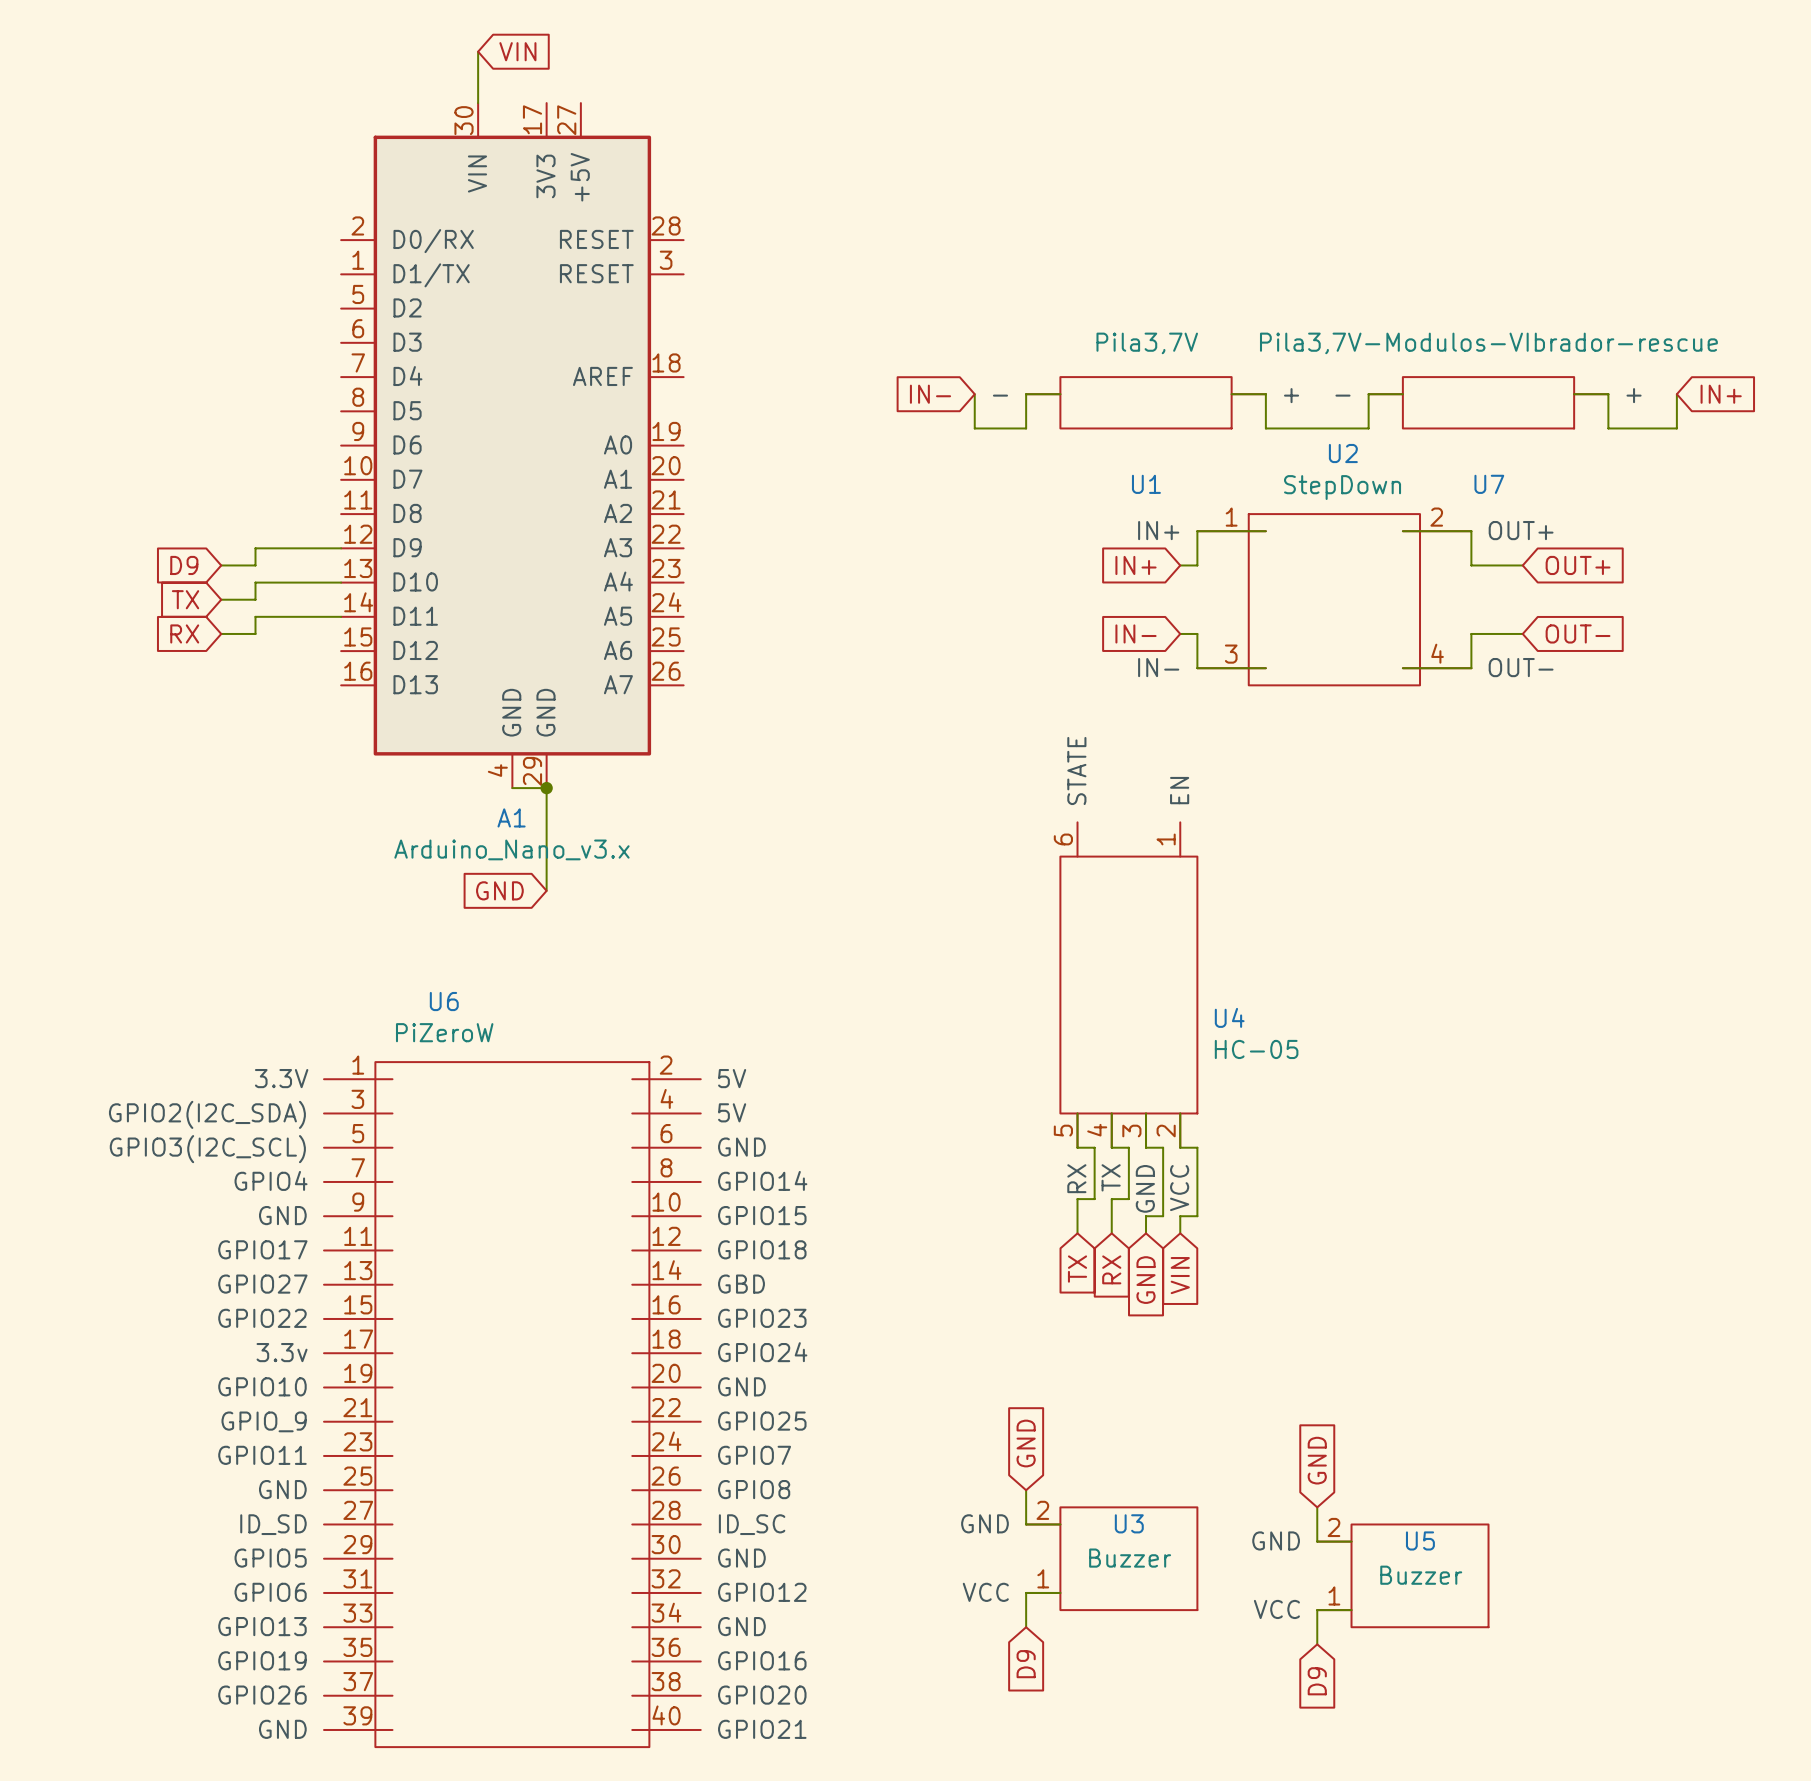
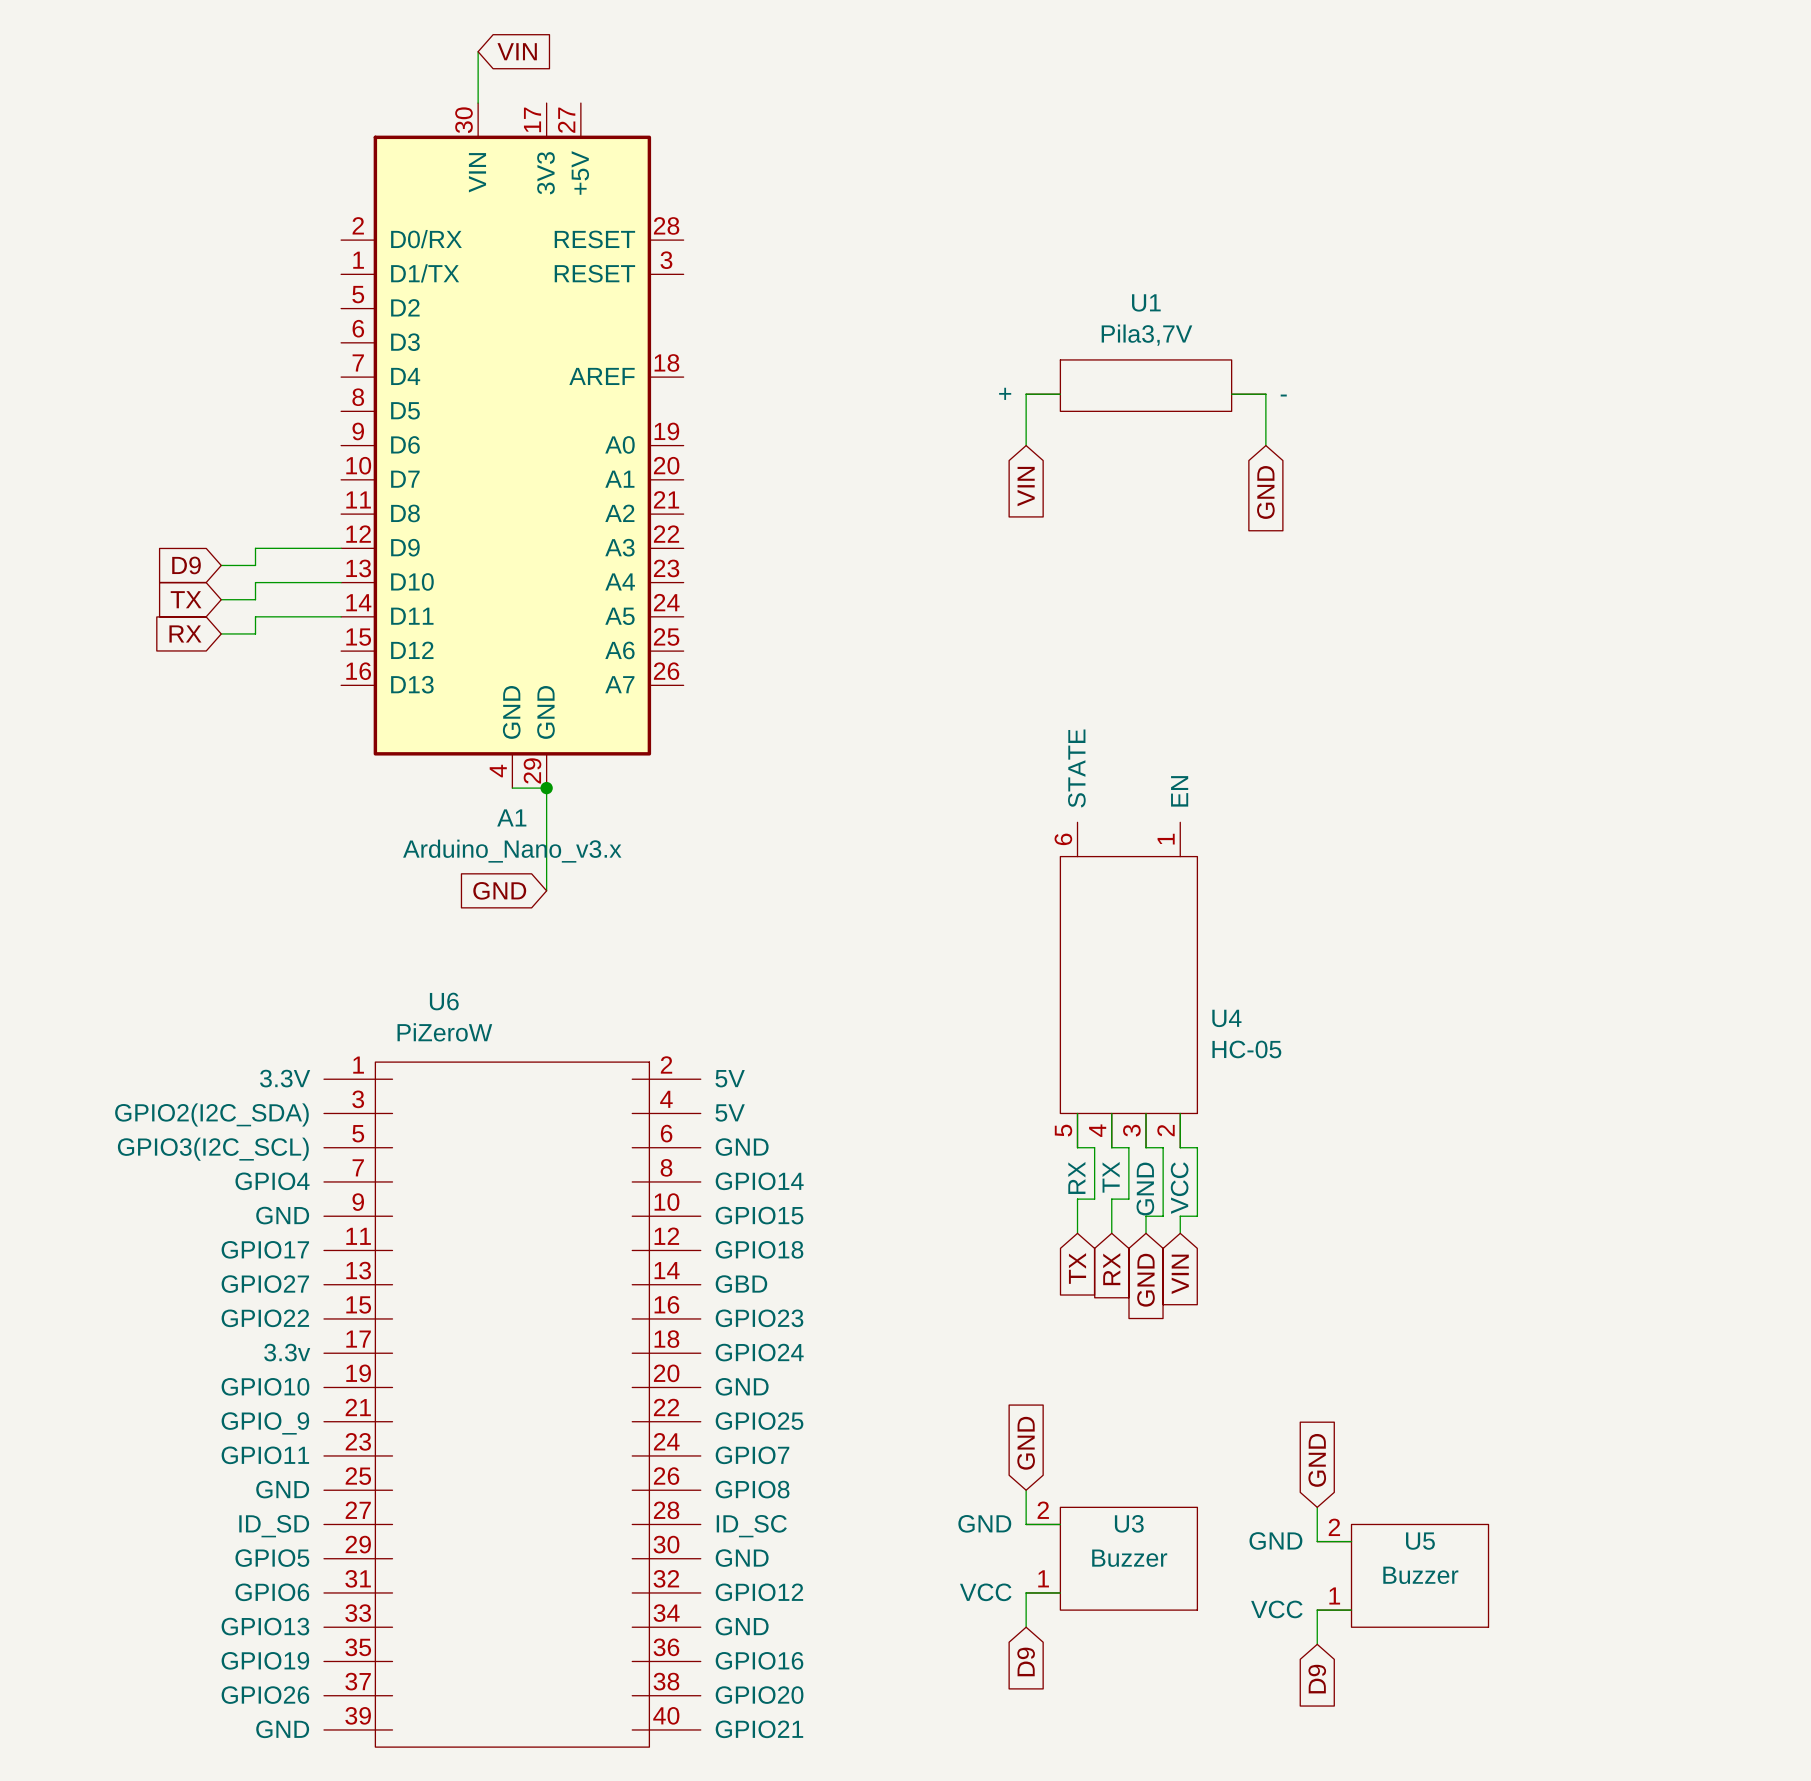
global label: IN- (930, 394) -> none
wire: (974, 394) (974, 428) (1026, 428) -> (1026, 445) (1026, 428)
wire: (1402, 394) (1368, 394) (1368, 428) (1265, 428) -> (1265, 445) (1265, 428)
wire: (1574, 394) (1608, 394) (1608, 428) (1676, 428) (1676, 394) -> none
global label: IN+ (1721, 394) -> none
U1 rotation: 0° (1146, 402) -> 180° (1146, 385)
U7: Pila3,7V-Modulos-VIbrador-rescue (1488, 402) -> none
global label: none -> VIN (1026, 486)
global label: none -> GND (1265, 492)
wire: (1265, 531) (1197, 531) (1197, 565) (1180, 565) -> none
wire: (1402, 531) (1471, 531) (1471, 565) (1522, 565) -> none
global label: IN+ (1135, 565) -> none
global label: OUT+ (1578, 565) -> none
U2: StepDown (1334, 599) -> none
global label: IN- (1135, 633) -> none
wire: (1180, 633) (1197, 633) (1197, 668) (1265, 668) -> none
wire: (1522, 633) (1471, 633) (1471, 668) (1402, 668) -> none
global label: OUT- (1578, 633) -> none

